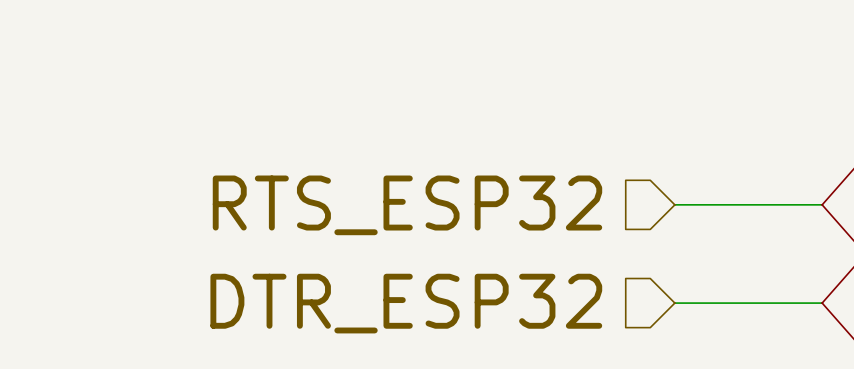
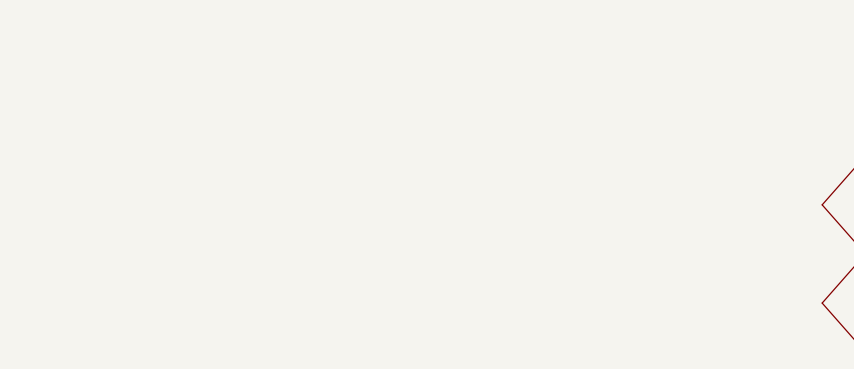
wire: (674, 204) (822, 204) -> none
hierarchical label: RTS_ESP32 (407, 205) -> none
hierarchical label: DTR_ESP32 (406, 303) -> none
wire: (674, 303) (822, 303) -> none

